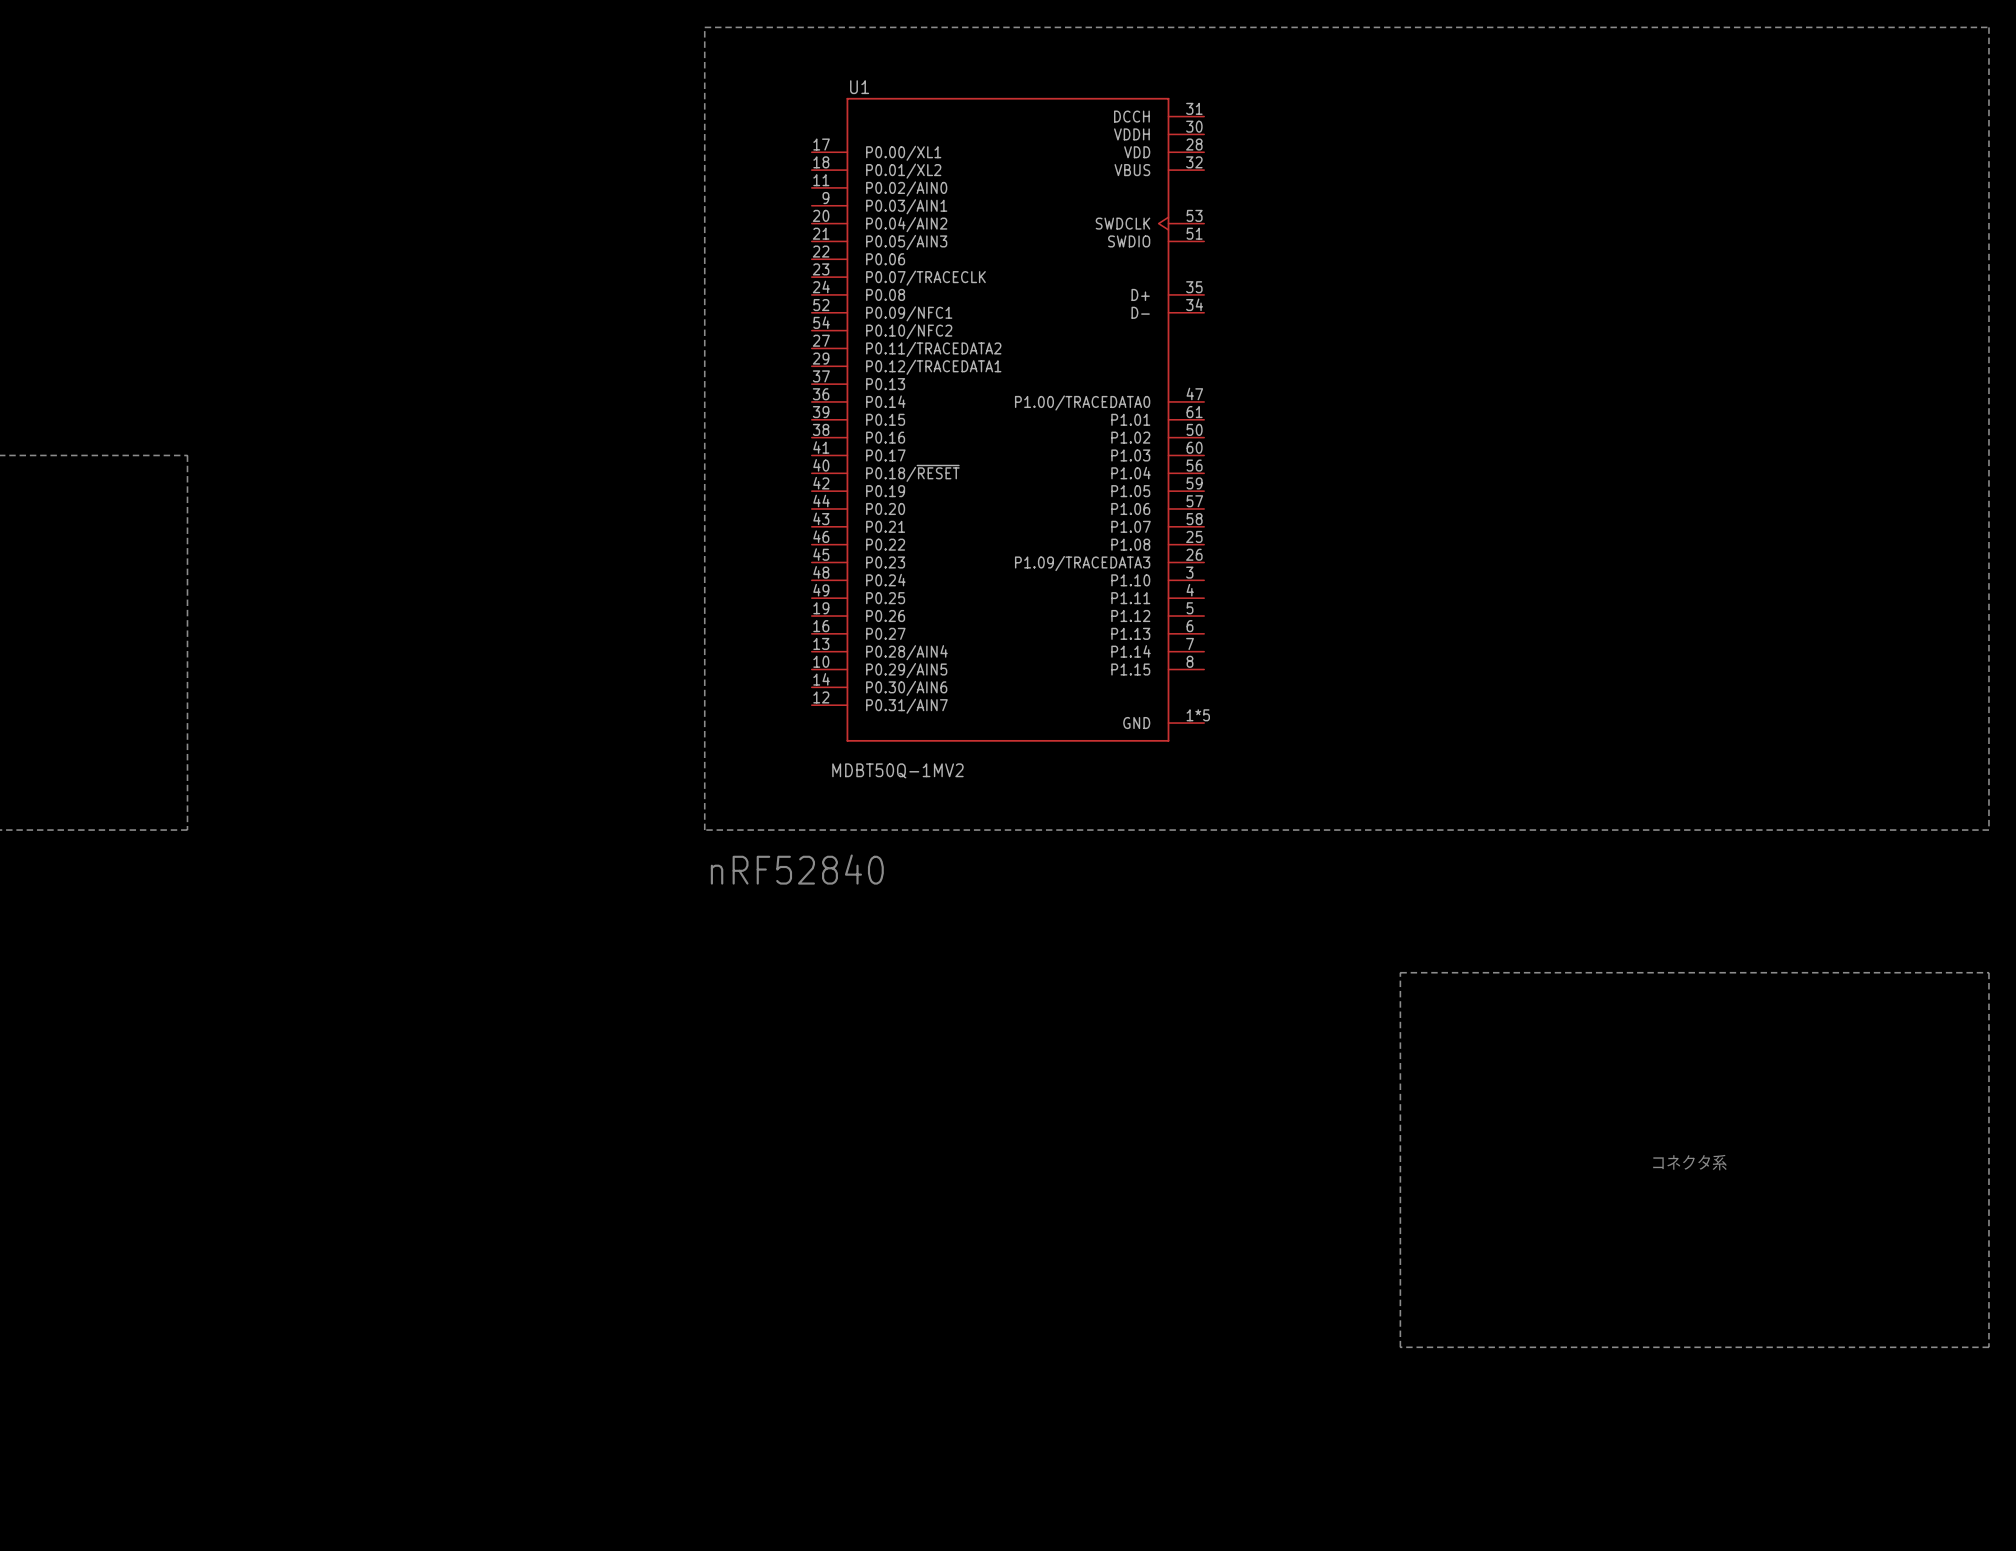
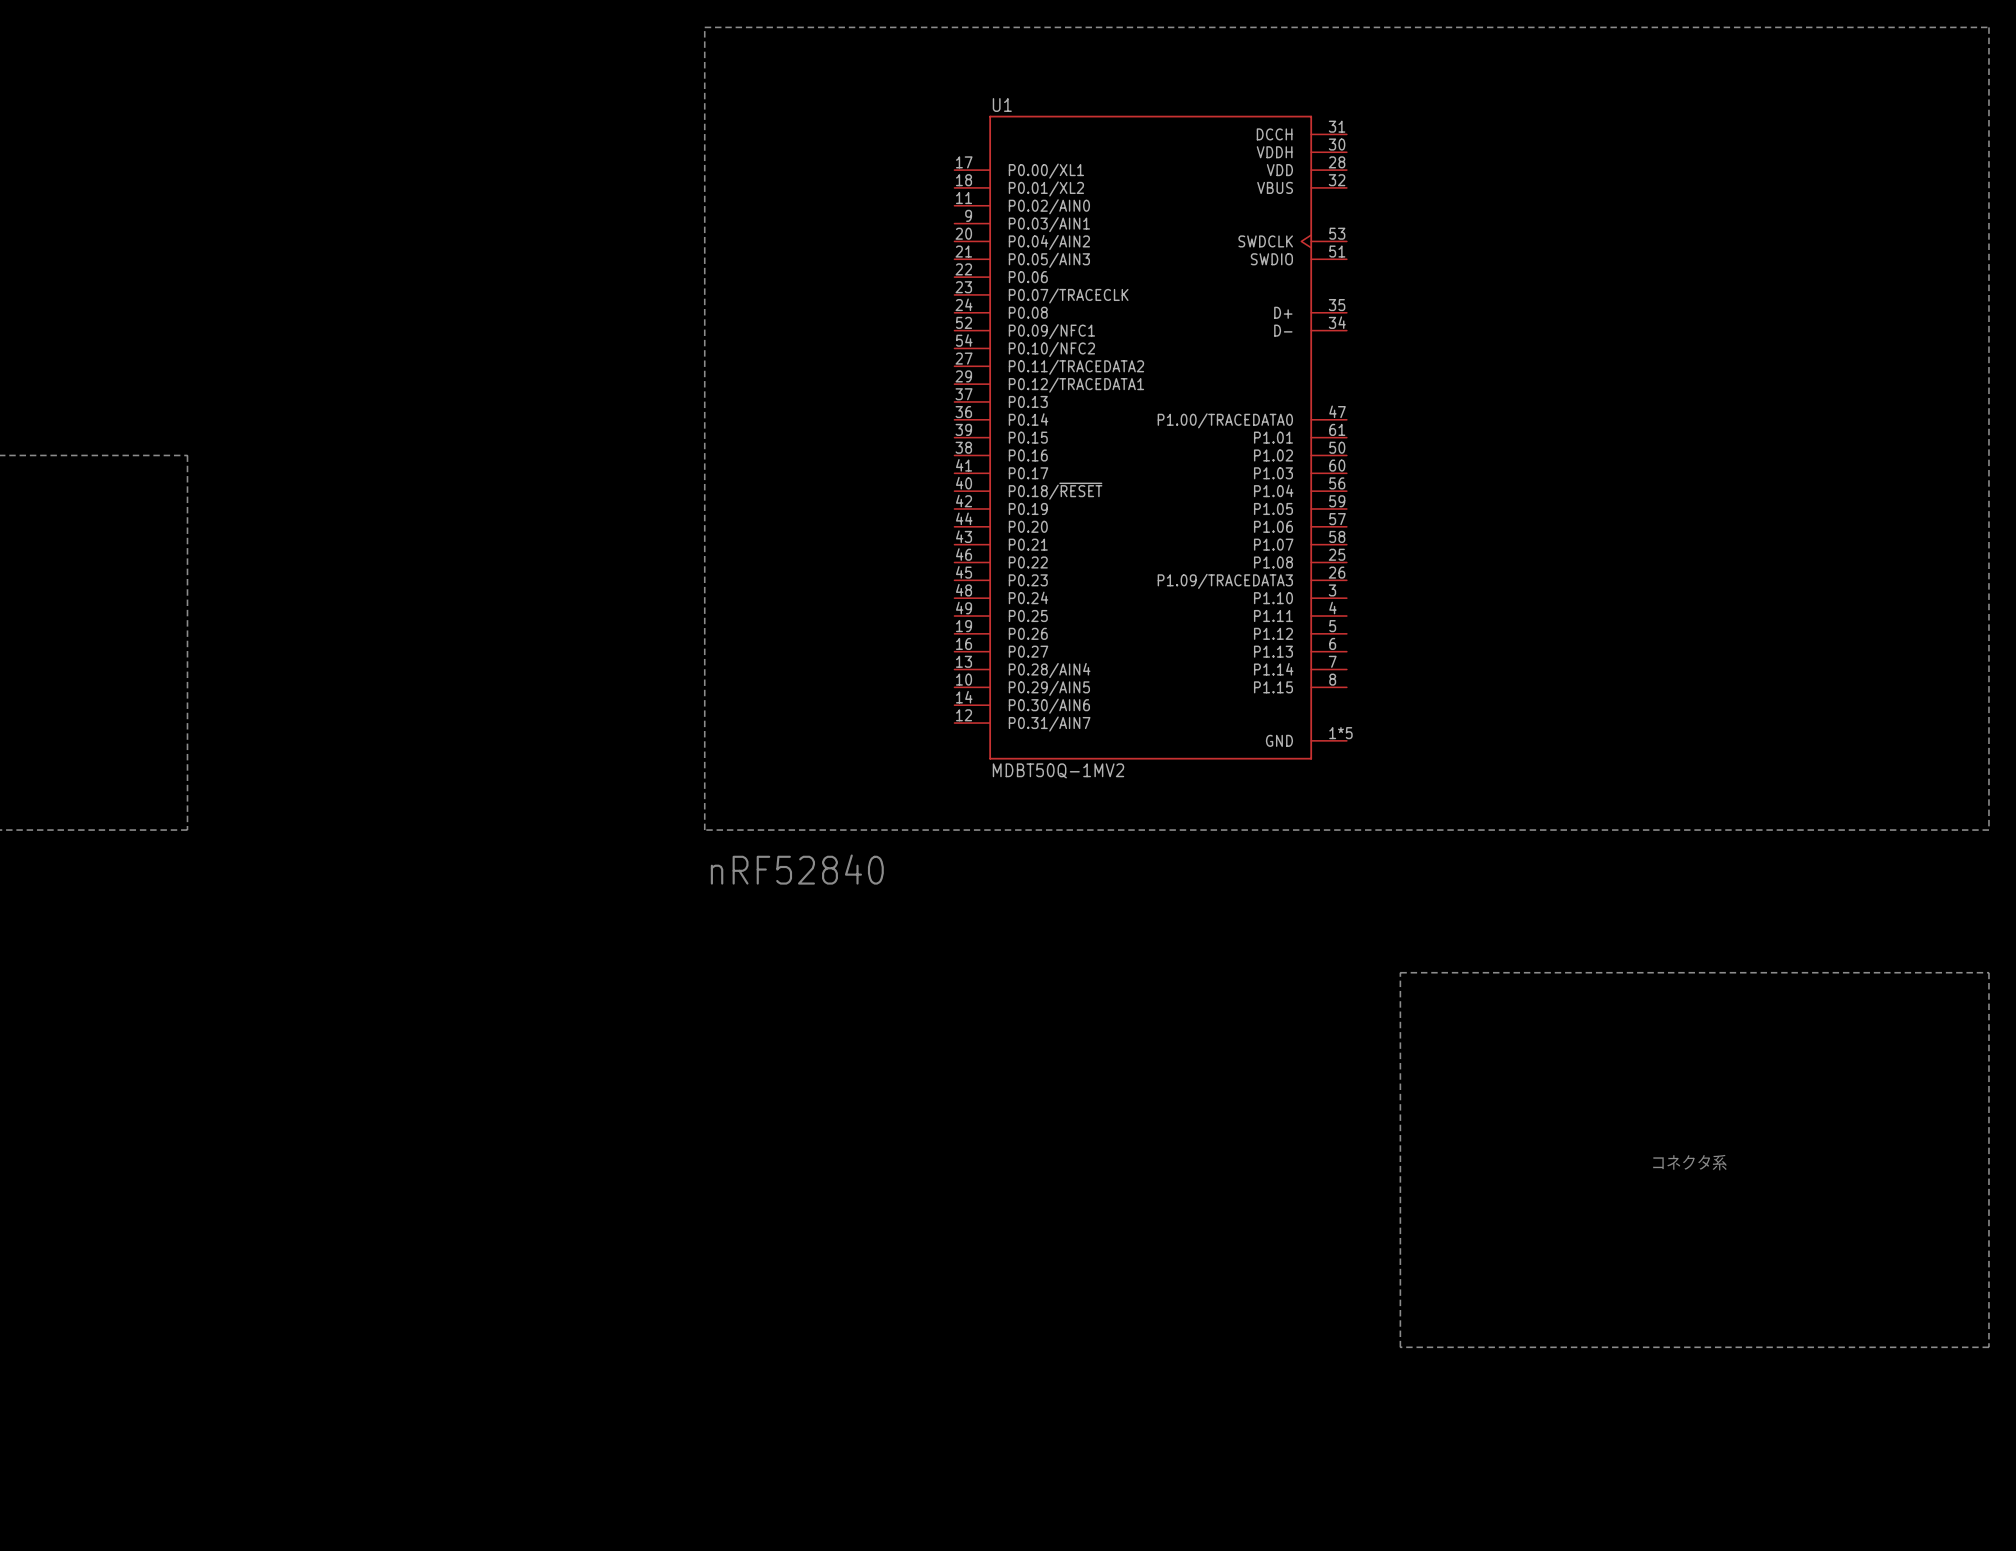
U1 position: (1007, 419) -> (1150, 437)
U1 value position: MDBT50Q-1MV2 (897, 770) -> MDBT50Q-1MV2 (1058, 770)

